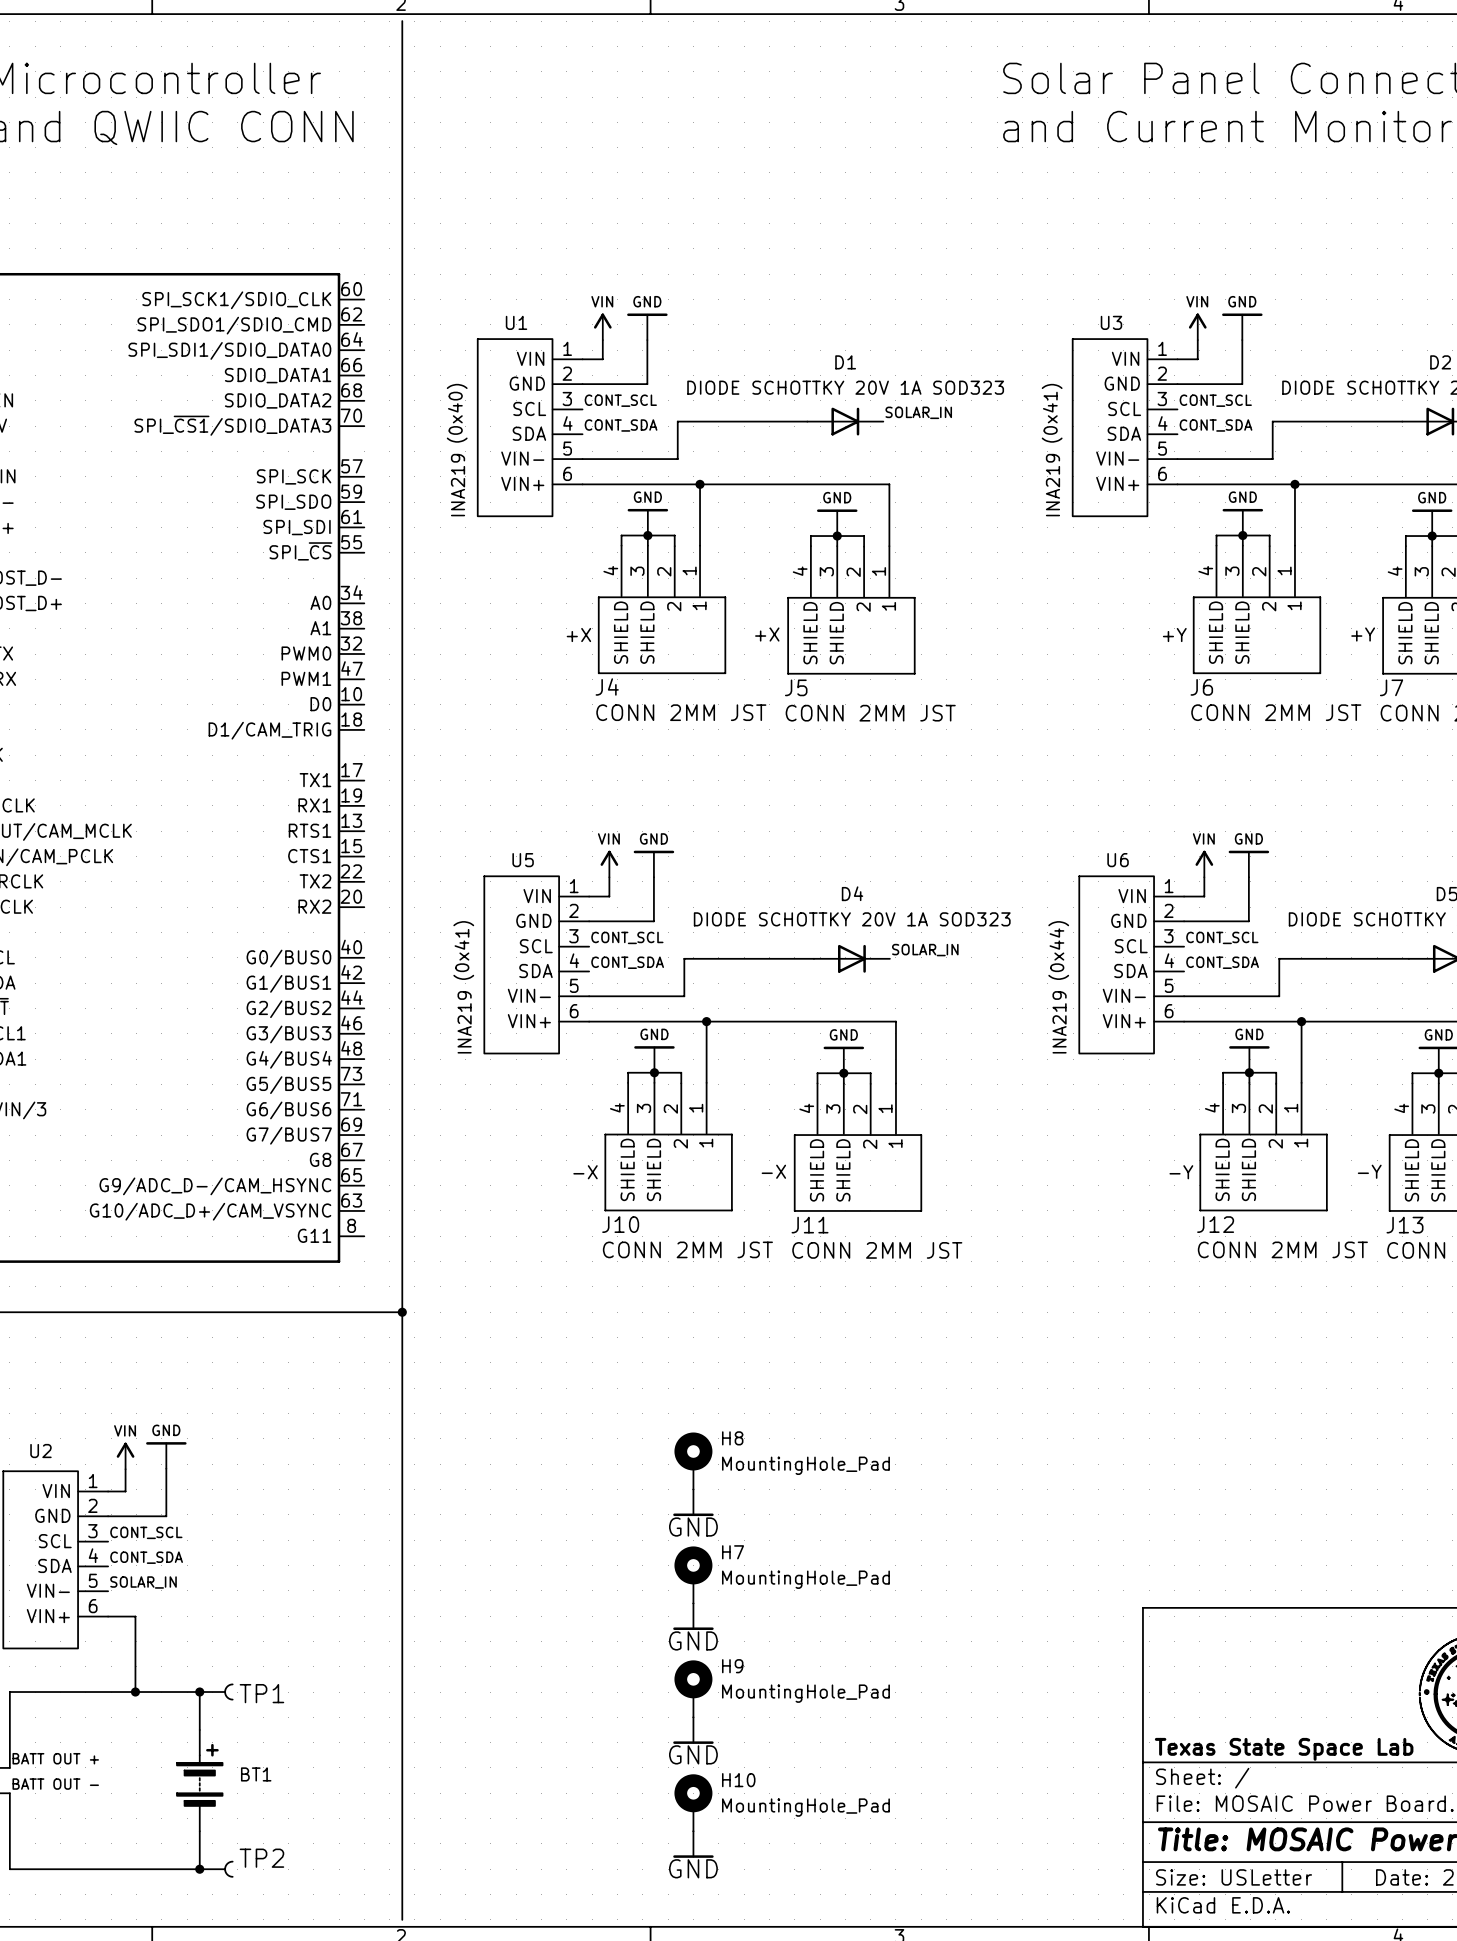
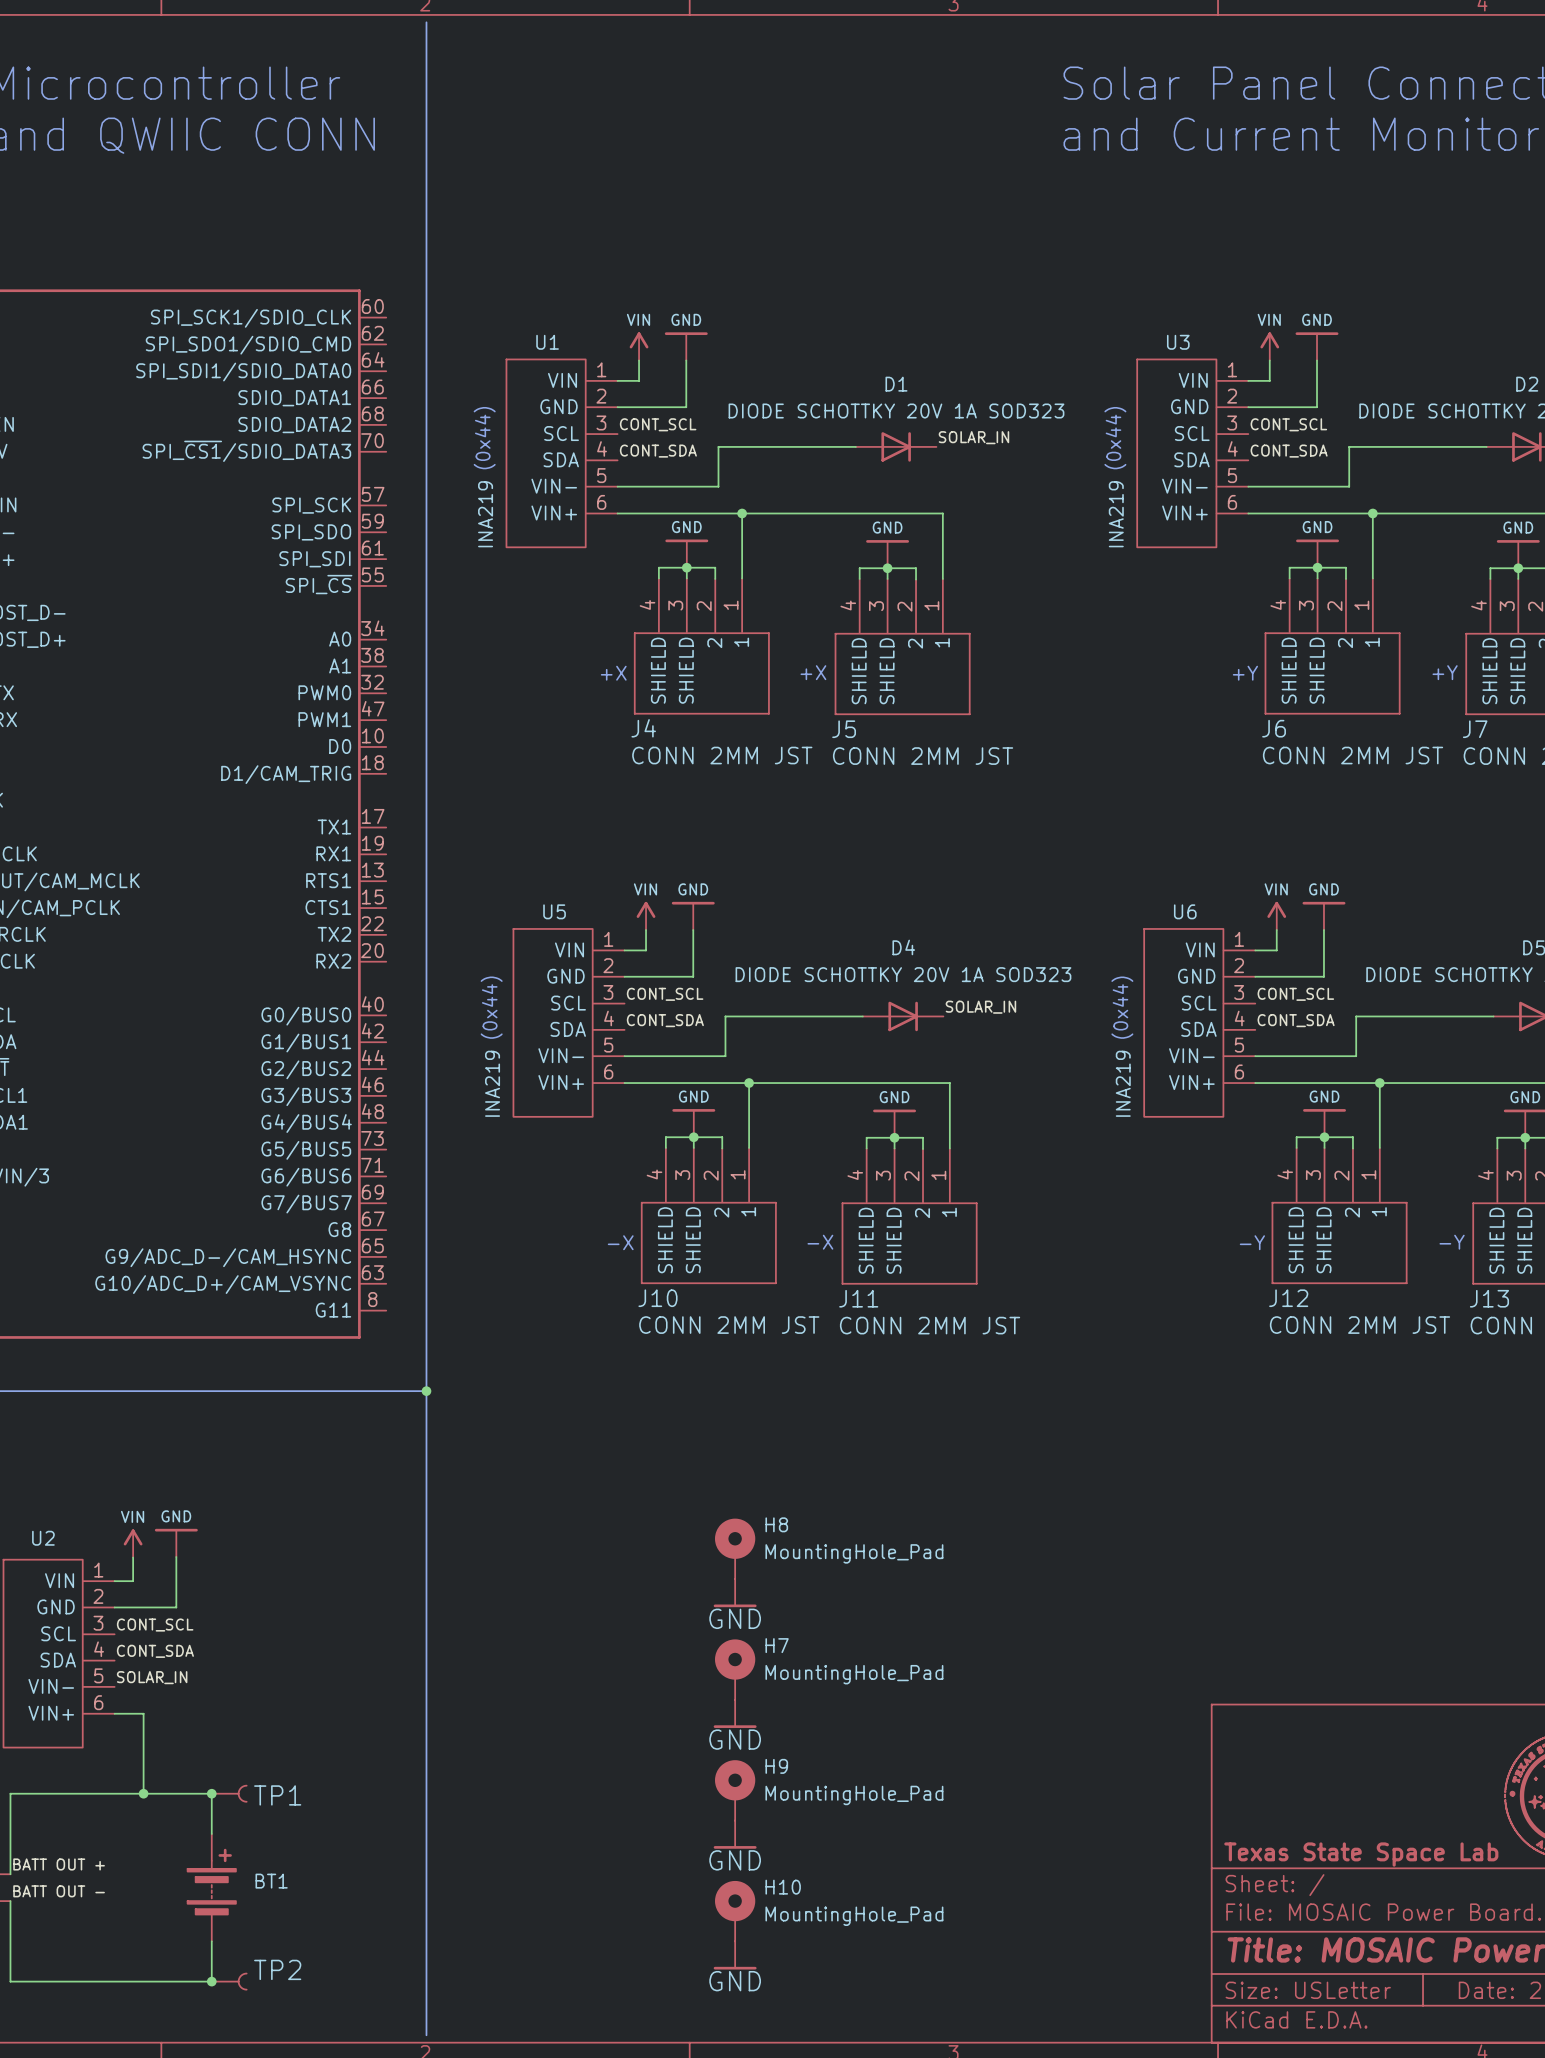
text: (0x40) (457, 413) -> (0x44) (484, 438)
text: (0x41) (1052, 413) -> (0x44) (1115, 438)
text: (0x41) (463, 950) -> (0x44) (491, 1007)

